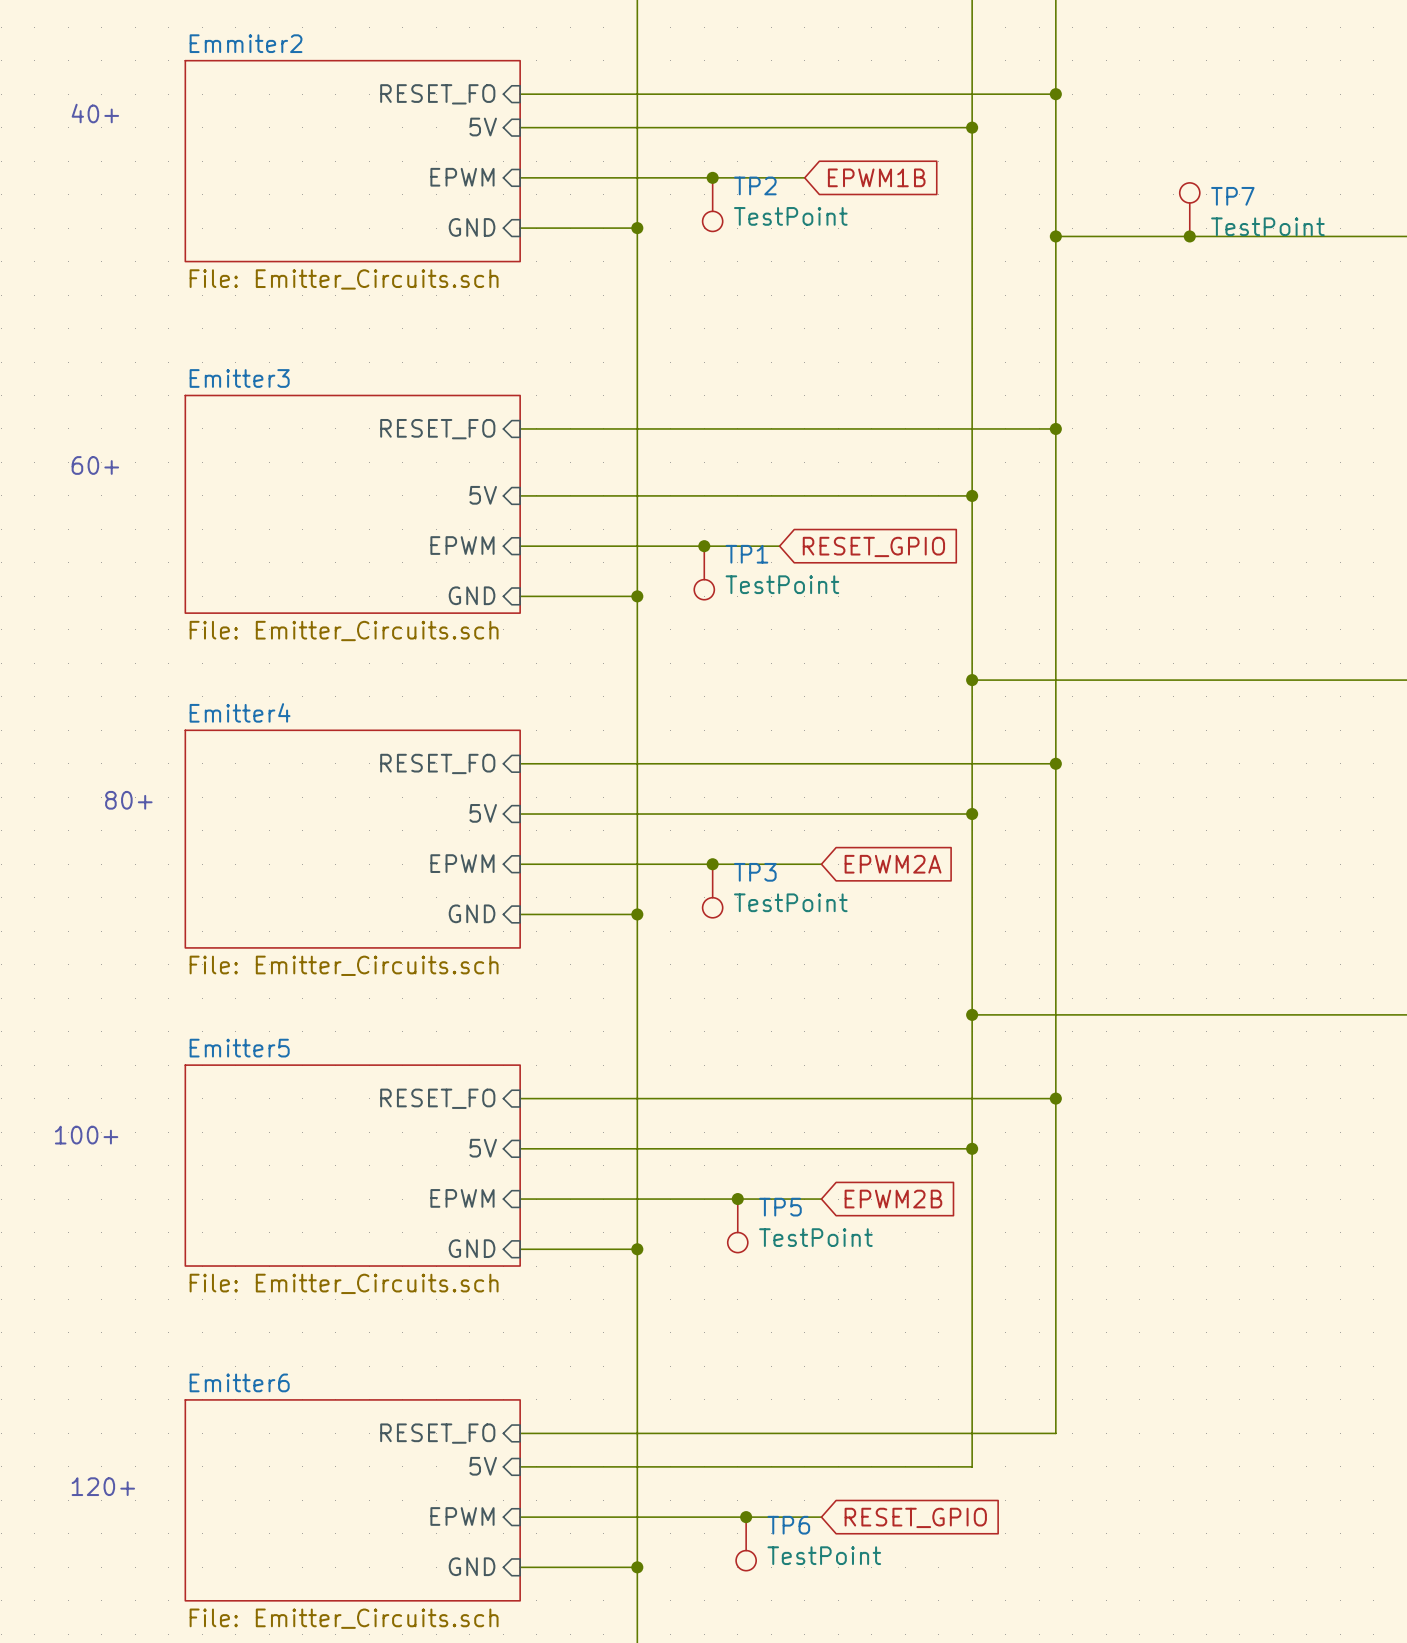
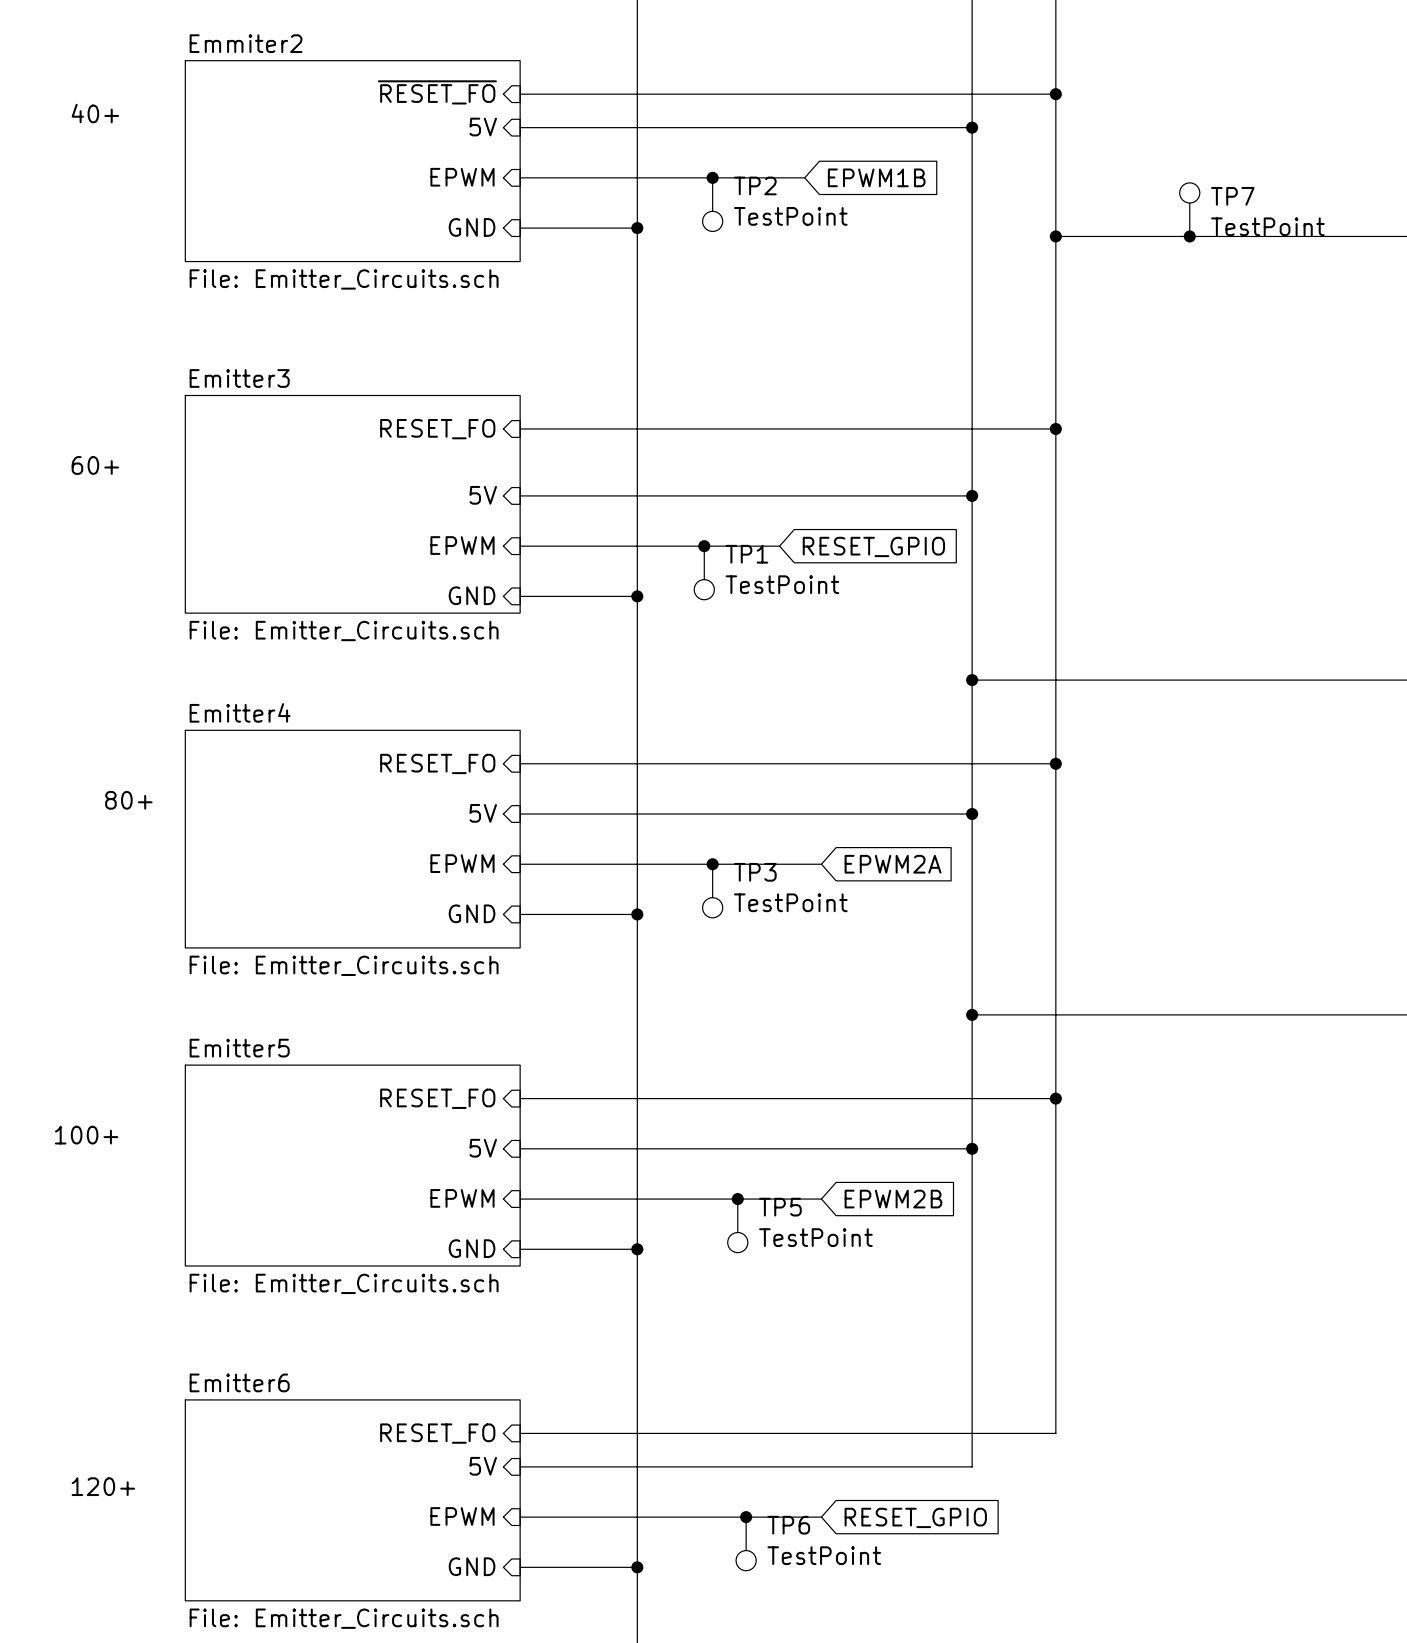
sheet pin: RESET_FO (437, 94) -> ~{RESET_FO} (437, 92)

